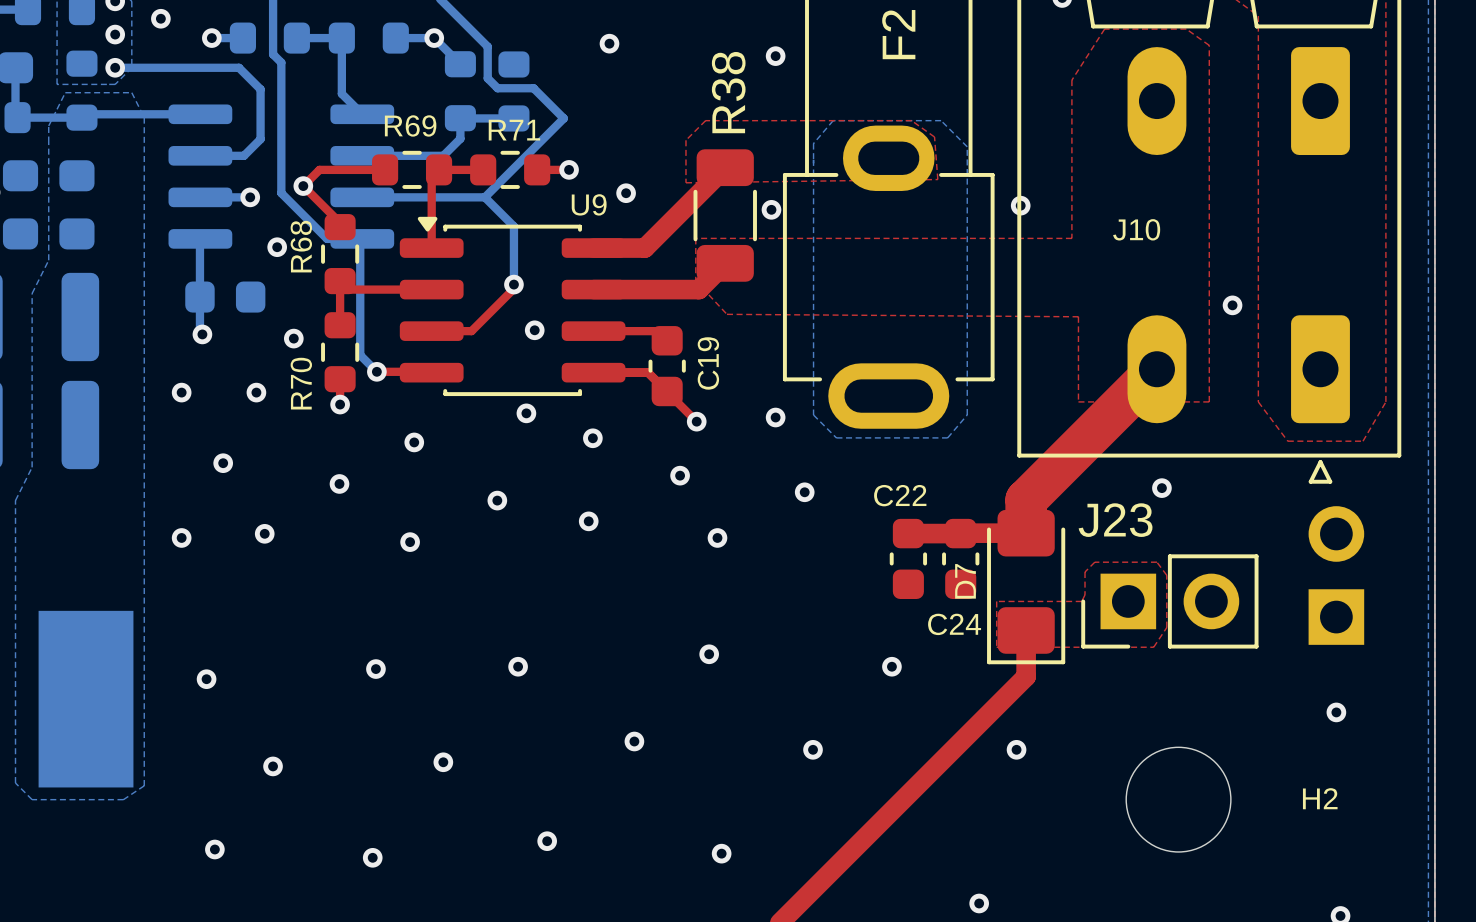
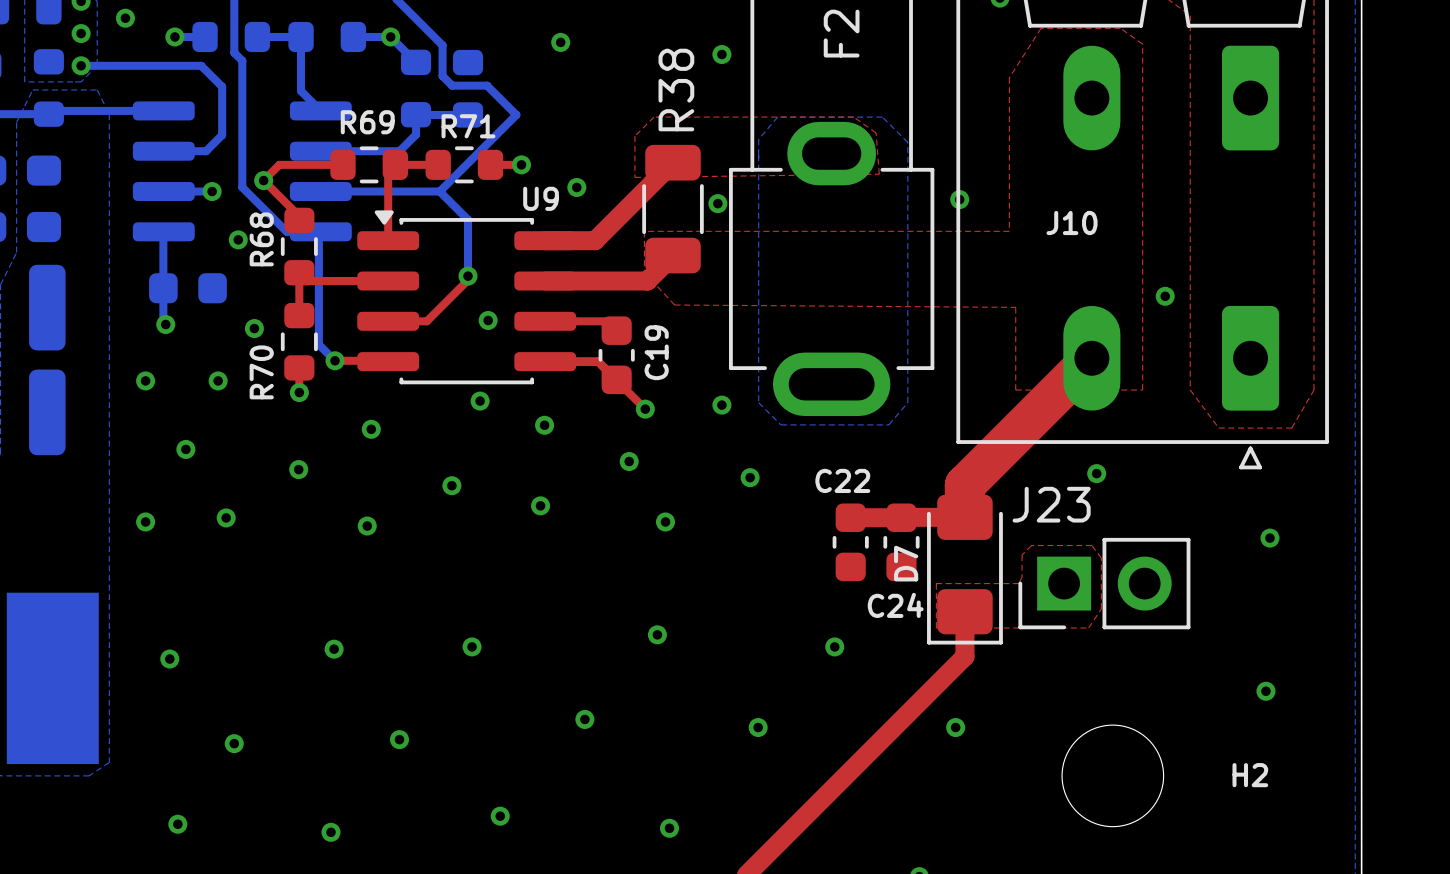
via: none -> (1270, 538)
part: (1336, 575) -> none

